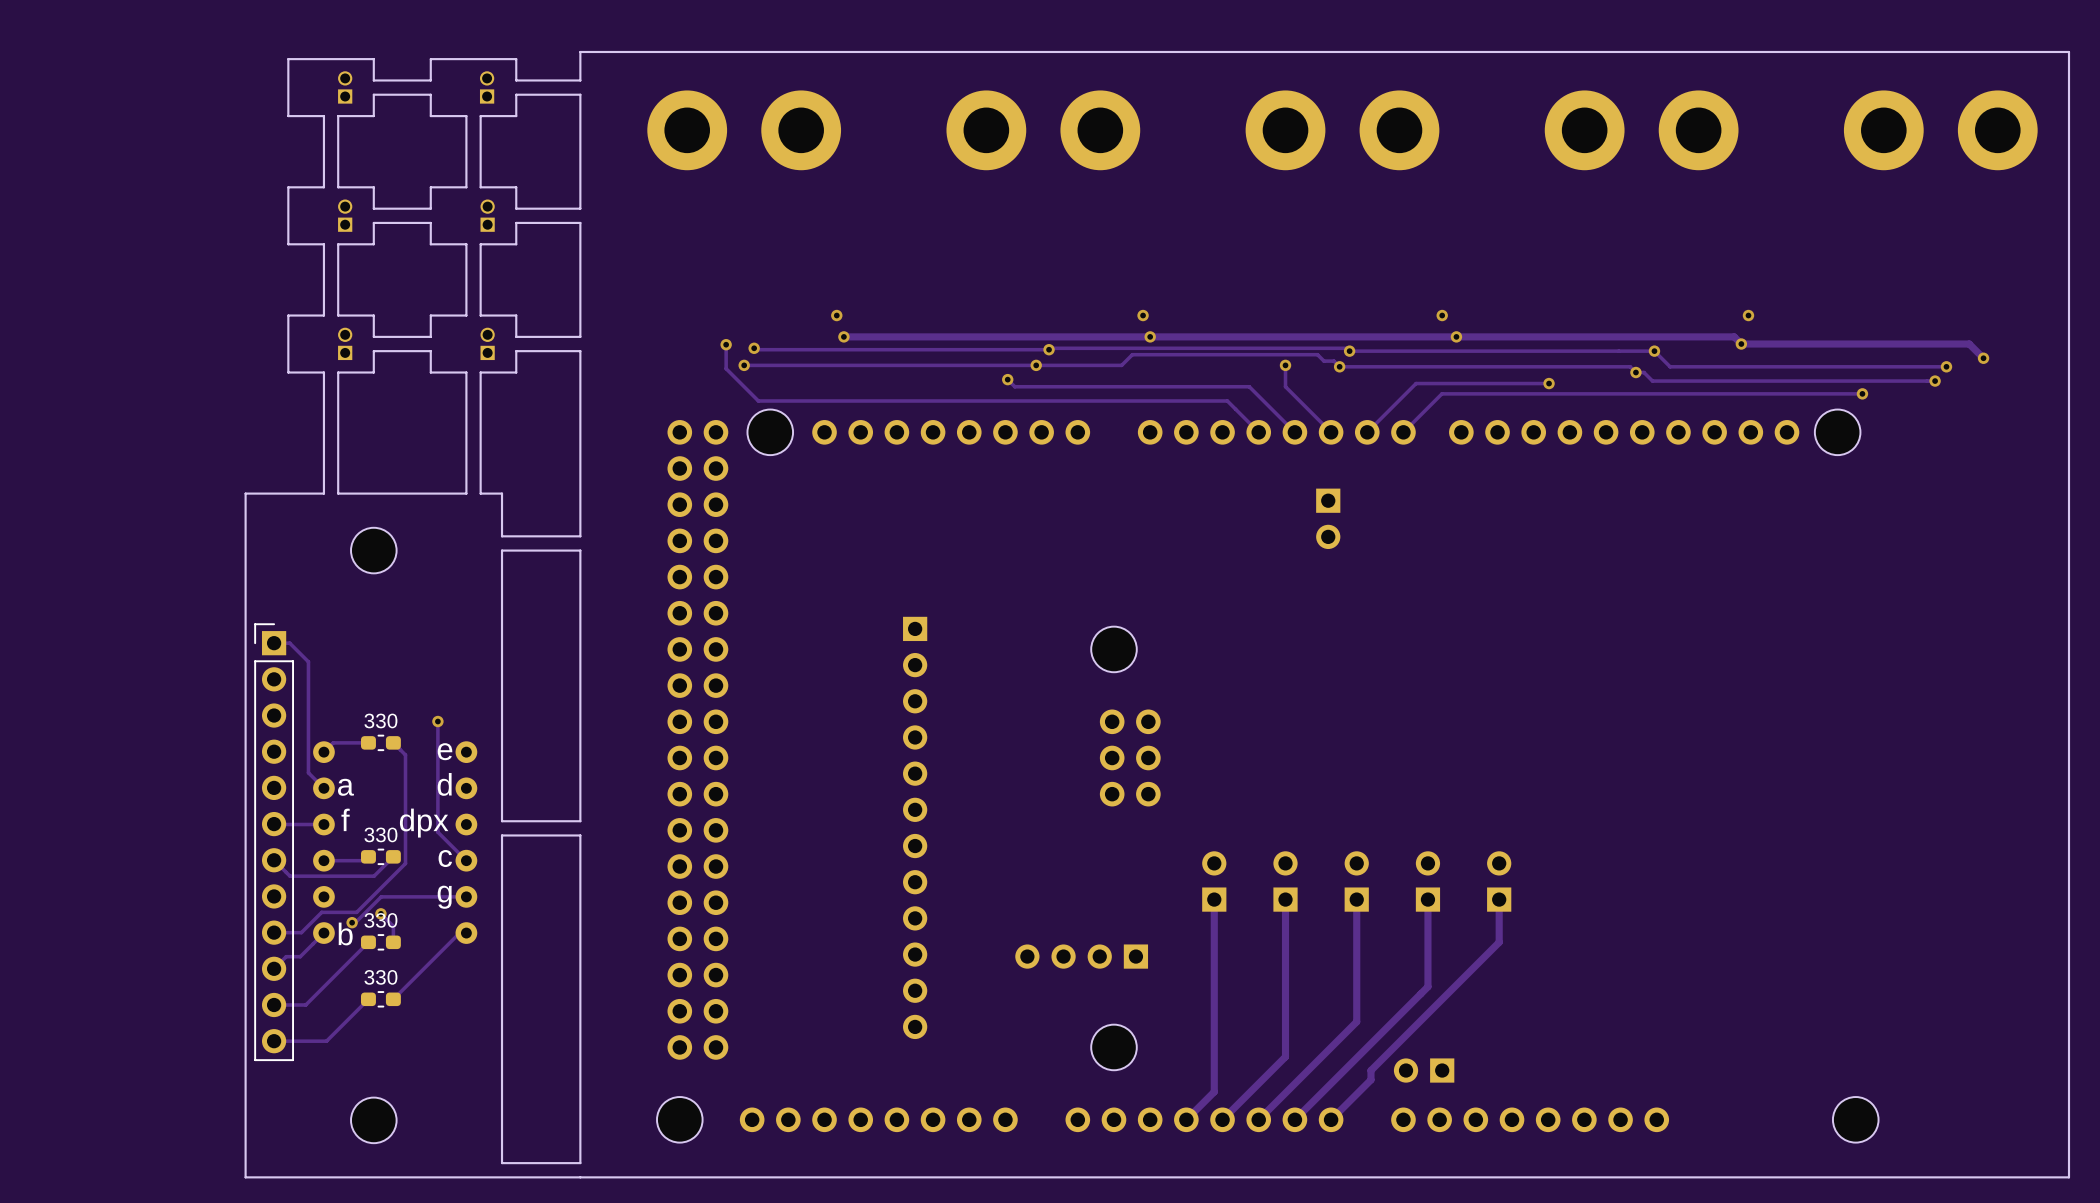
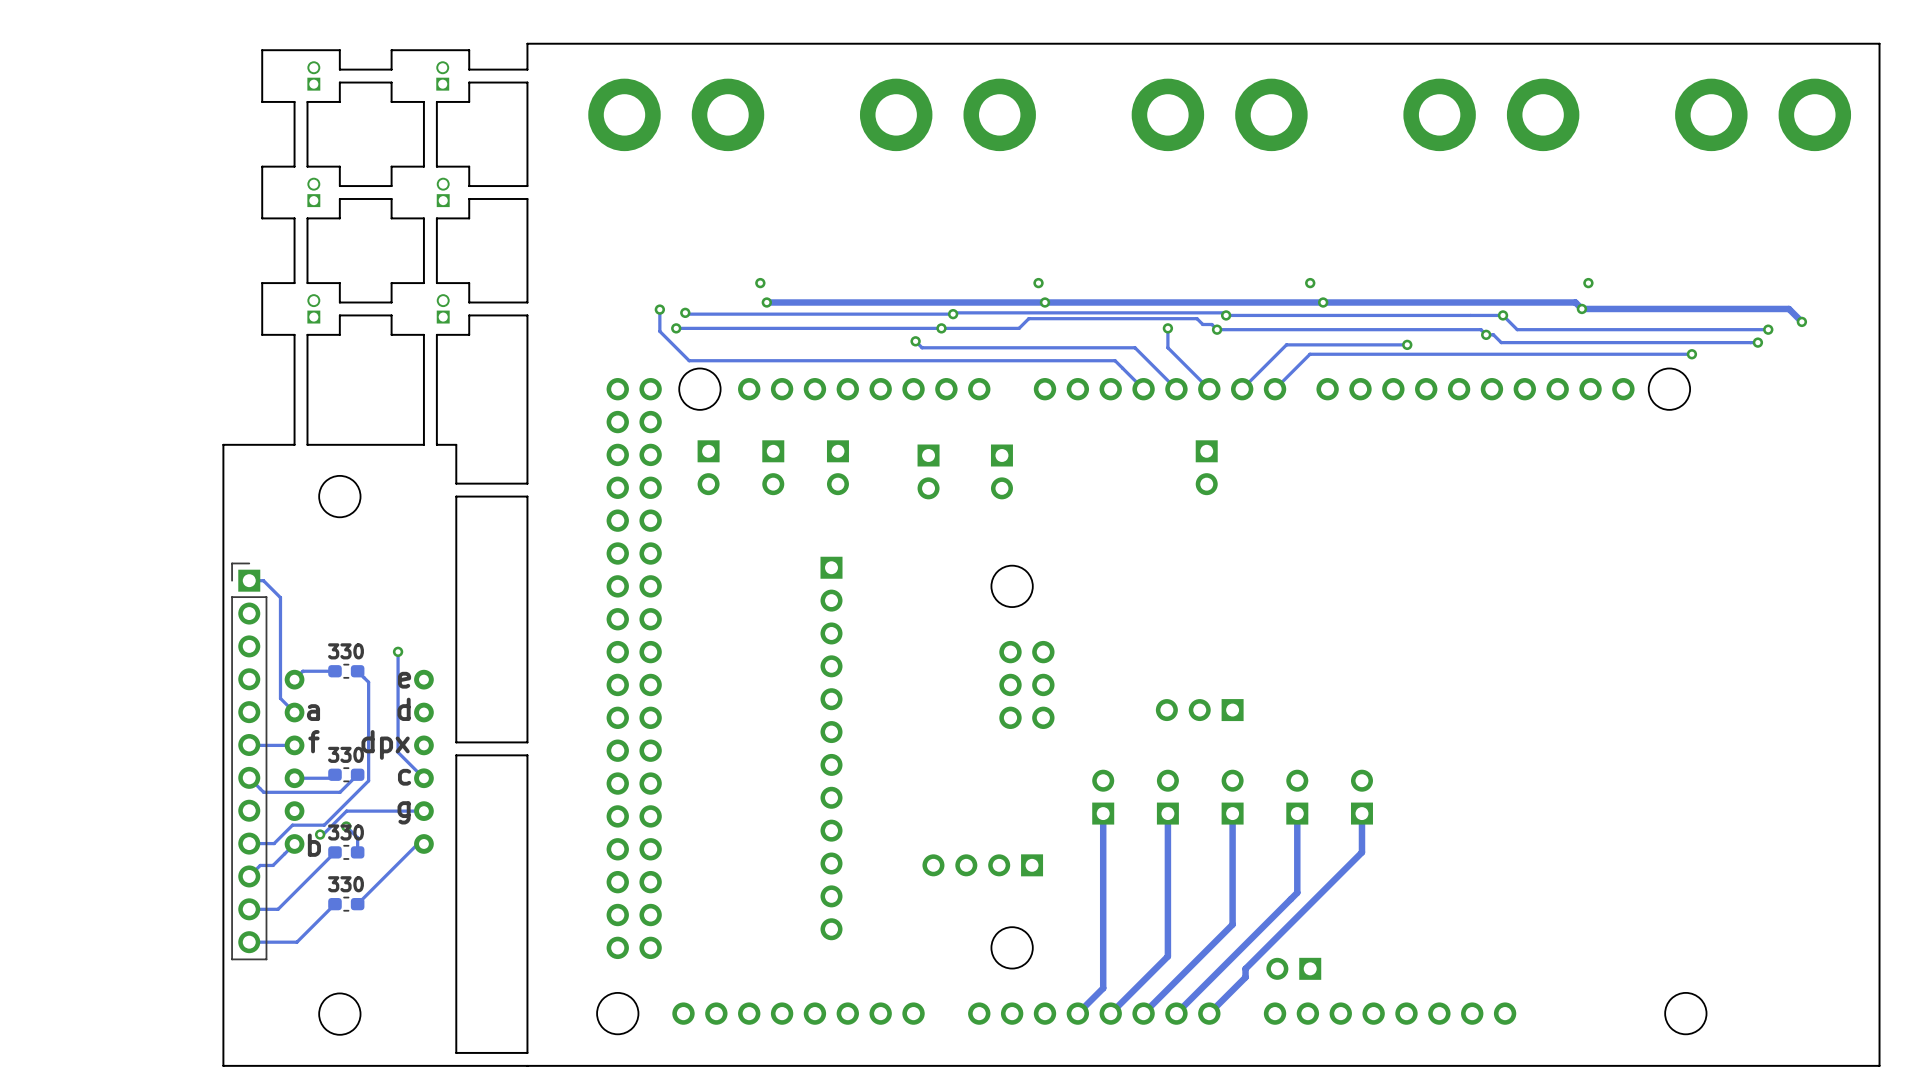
part: none -> (708, 467)
part: none -> (773, 467)
part: none -> (837, 467)
part: none -> (928, 471)
part: none -> (1001, 471)
part: none -> (1199, 710)

